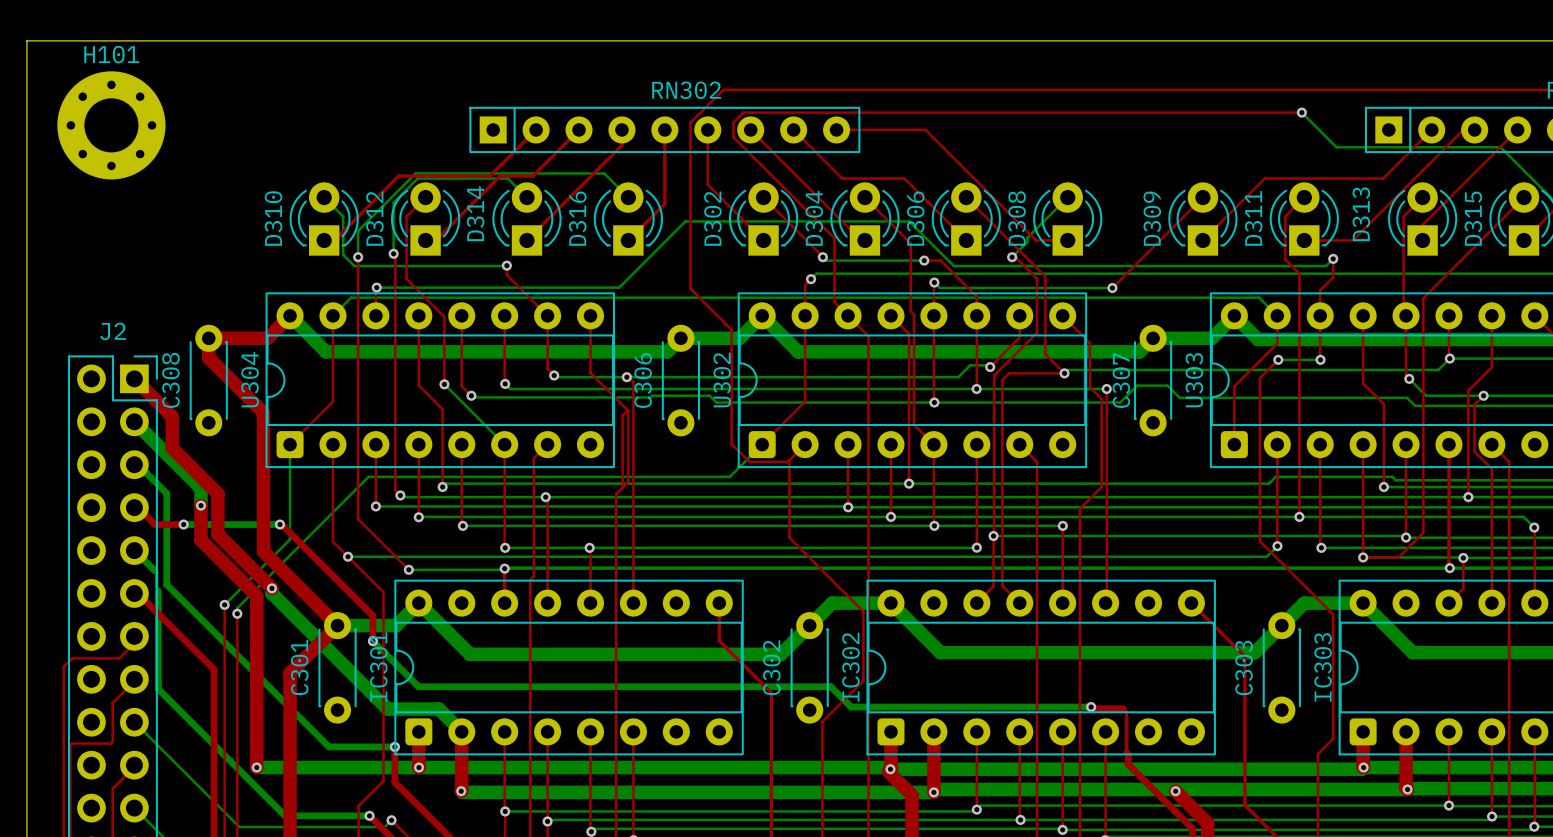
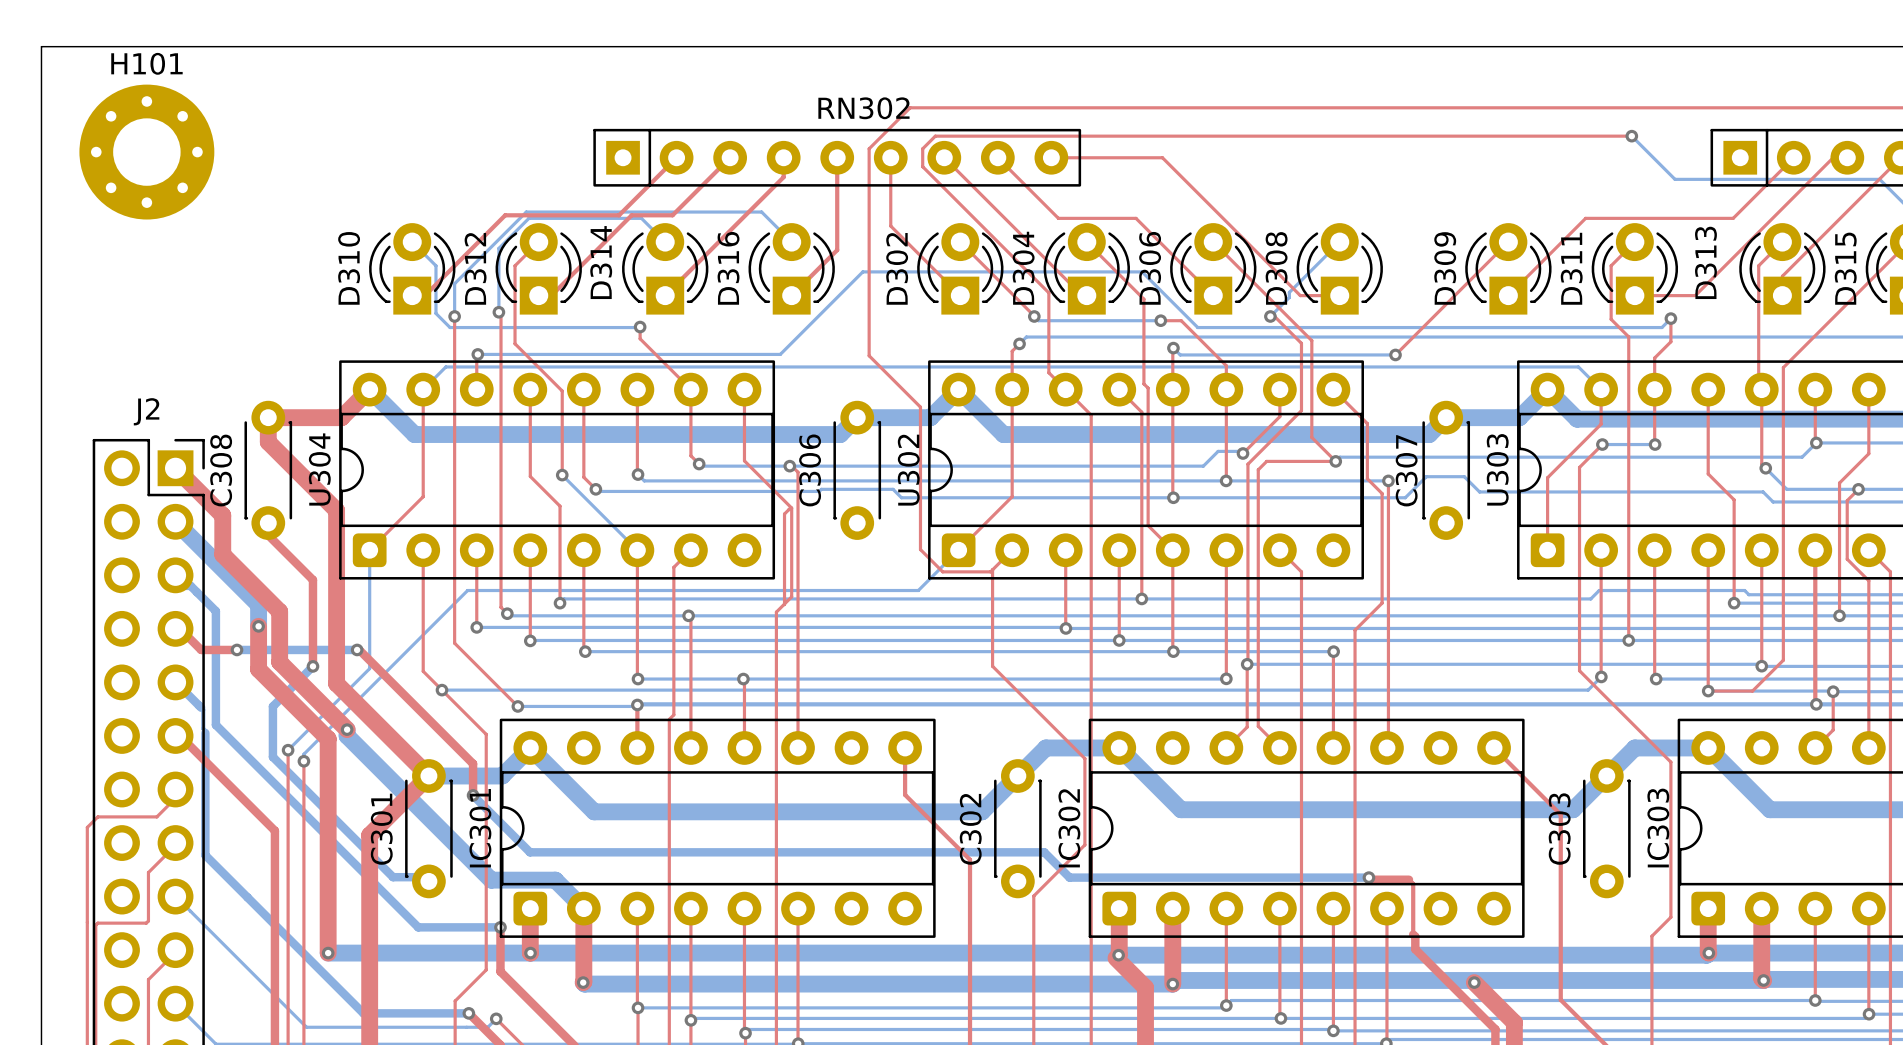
top track: none -> (264, 531) (312, 579) (312, 666)
bottom track: none -> (312, 666) (272, 706) (272, 757) (393, 877) (420, 877)
via: none -> (312, 666)

